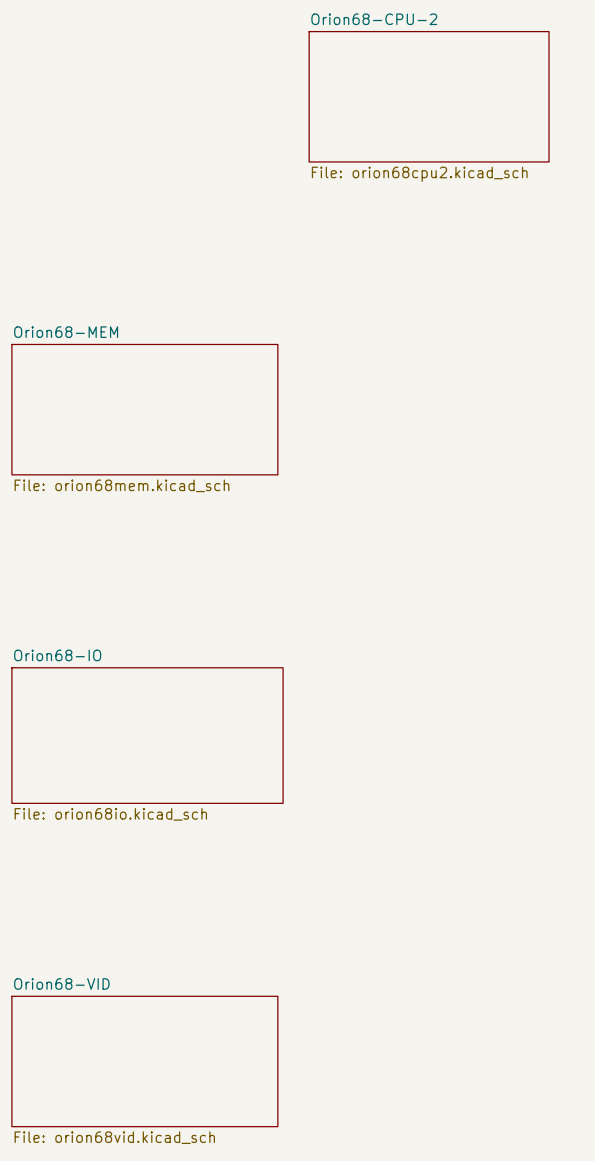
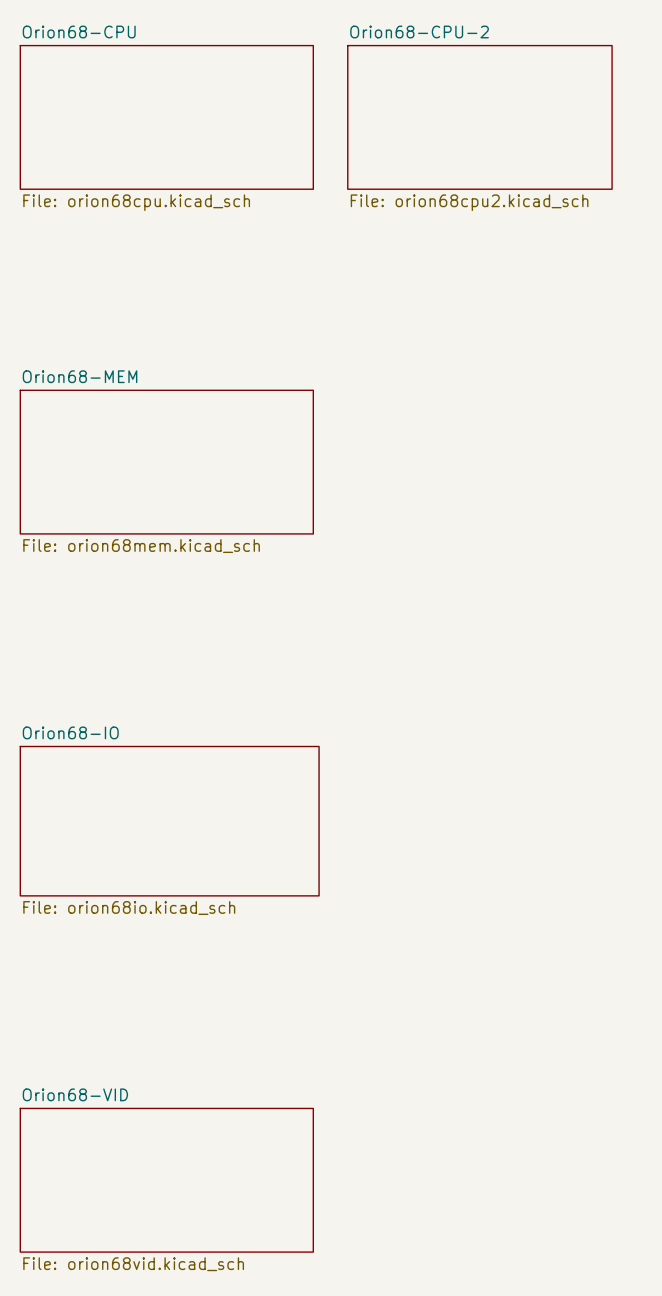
sheet Orion68-CPU: none -> File: orion68cpu.kicad_sch (166, 117)

